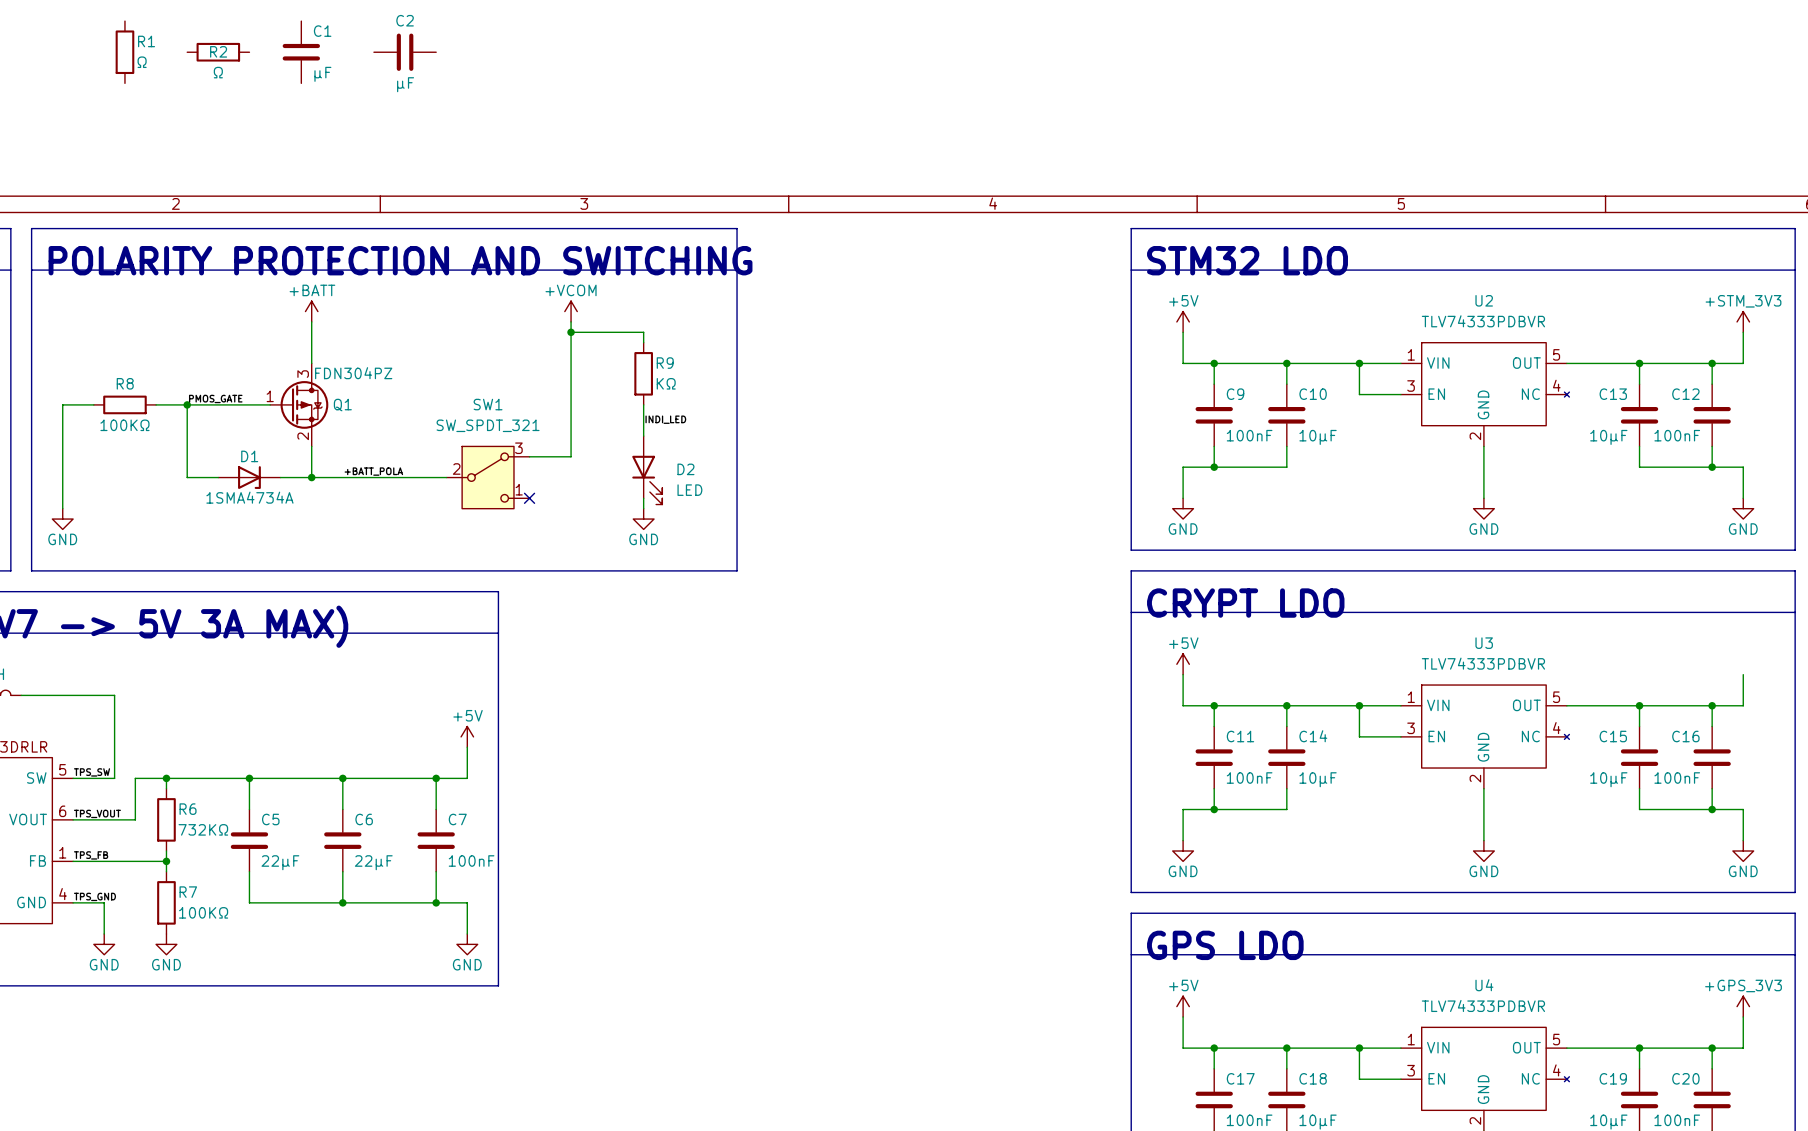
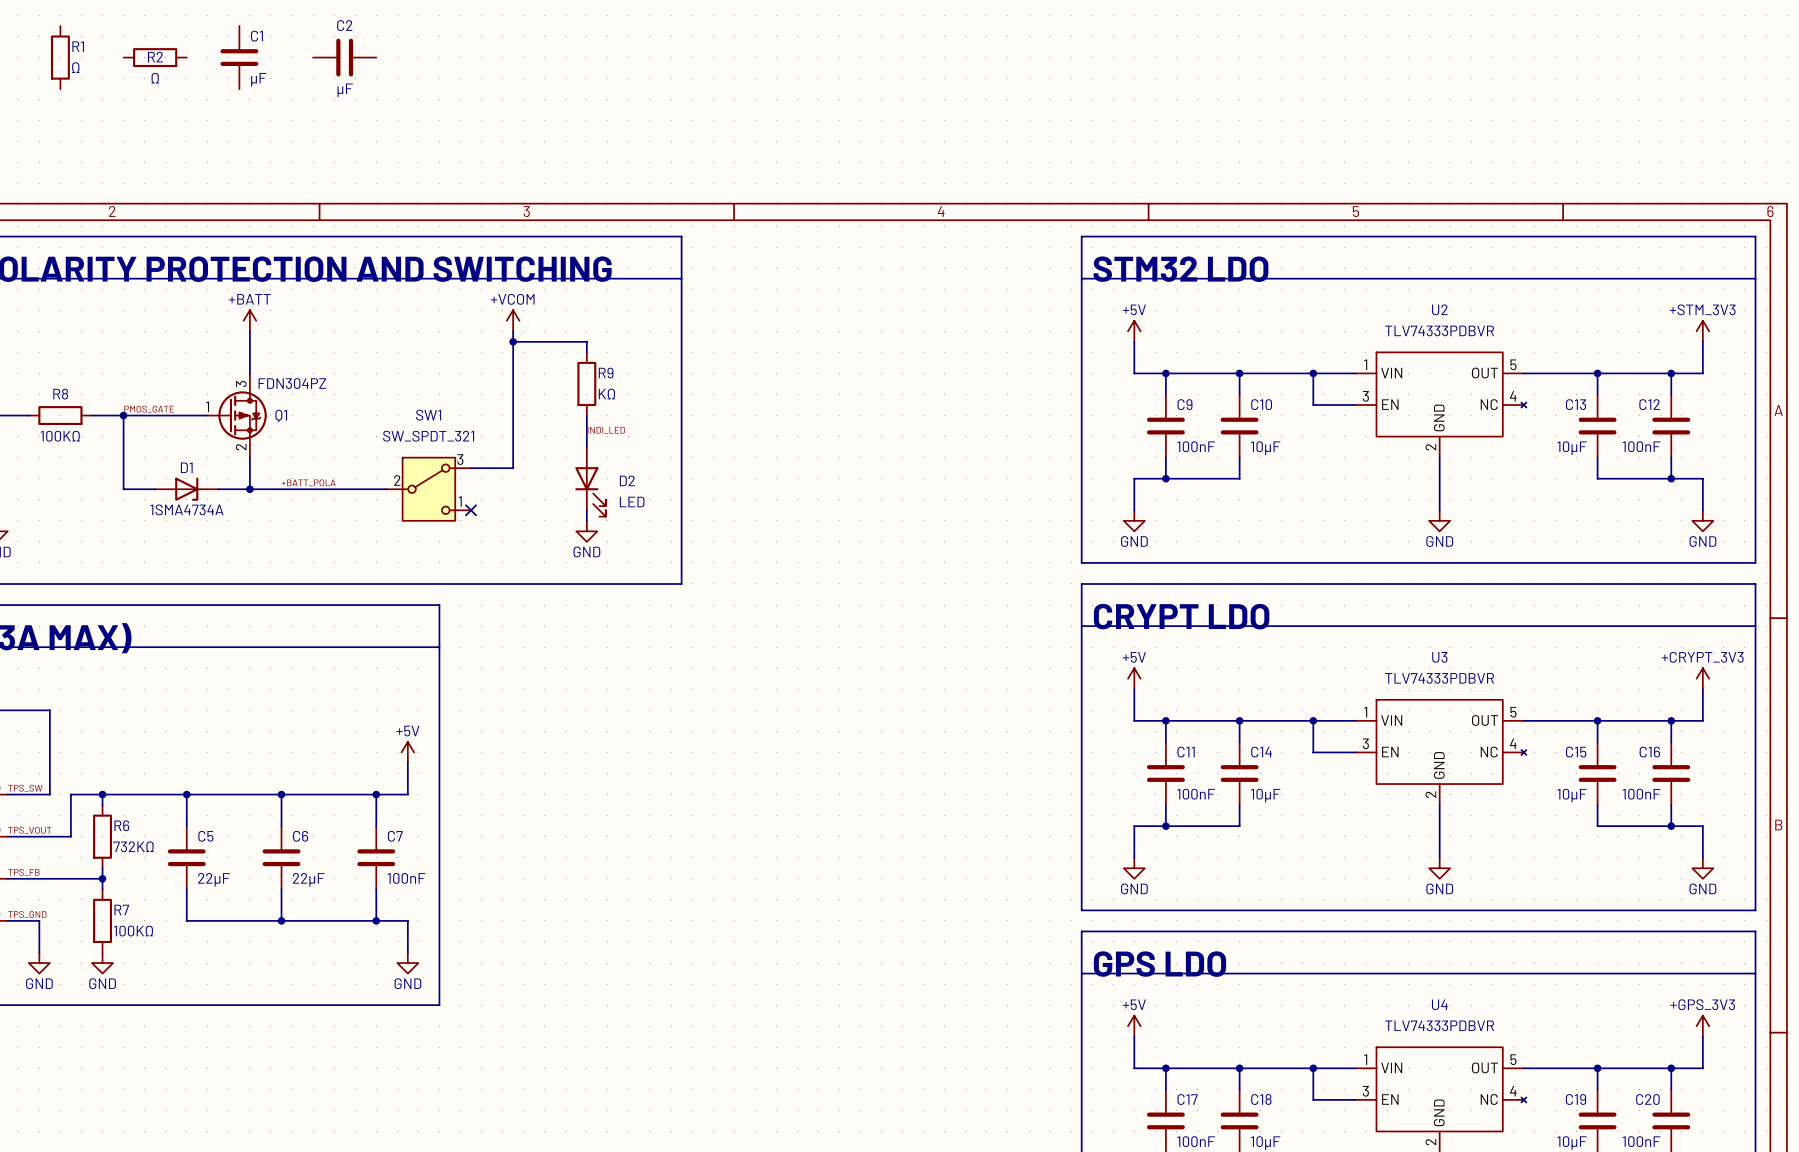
power symbol: none -> +CRYPT_3V3 (1702, 678)

